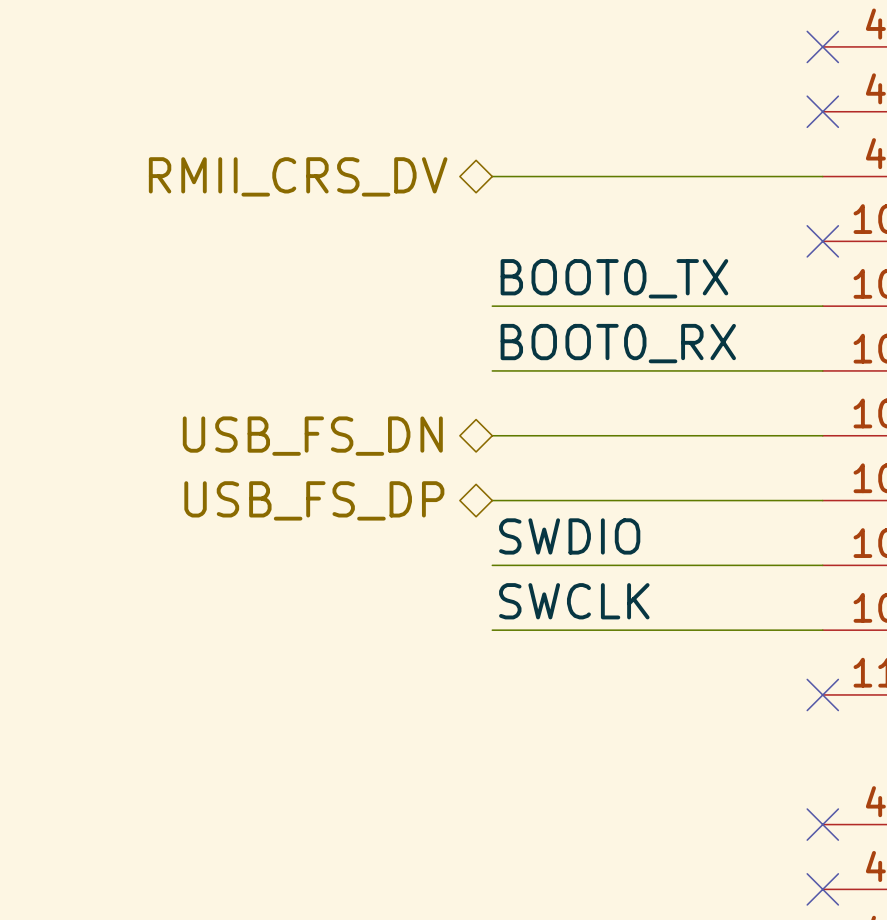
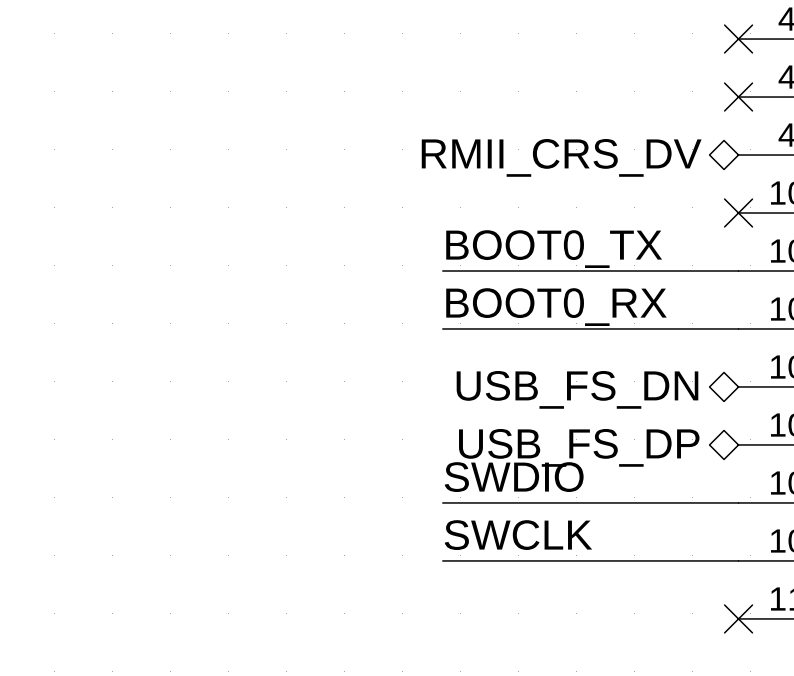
hierarchical label position: RMII_CRS_DV (298, 176) -> RMII_CRS_DV (561, 157)
wire: (492, 176) (822, 176) -> none
wire: (492, 435) (822, 435) -> none
hierarchical label position: USB_FS_DN (312, 436) -> USB_FS_DN (577, 389)
hierarchical label position: USB_FS_DP (314, 500) -> USB_FS_DP (579, 447)
wire: (492, 500) (822, 500) -> none

